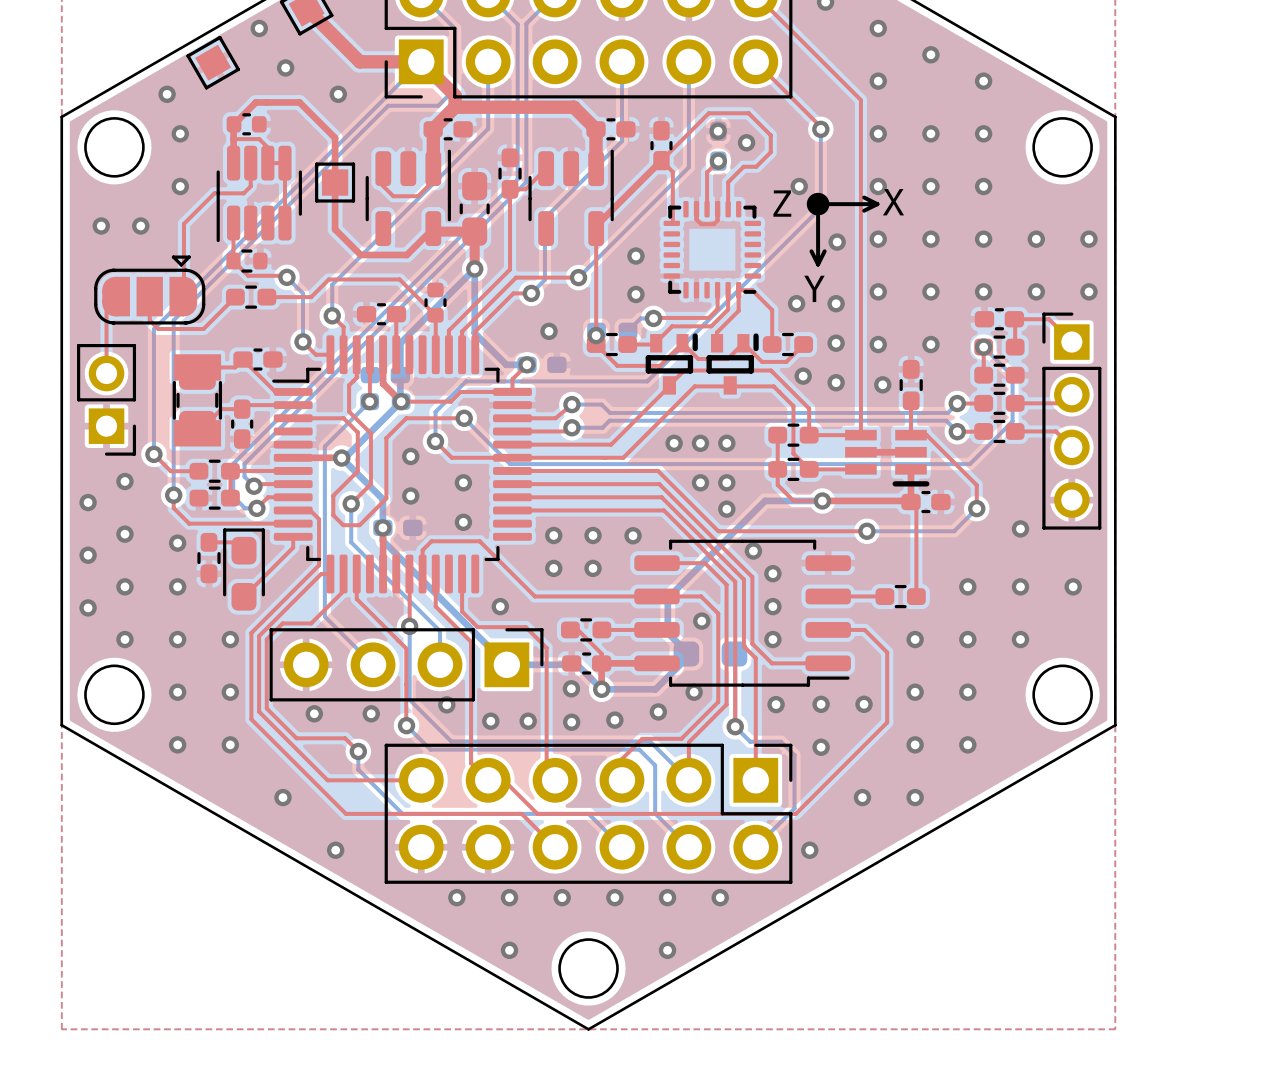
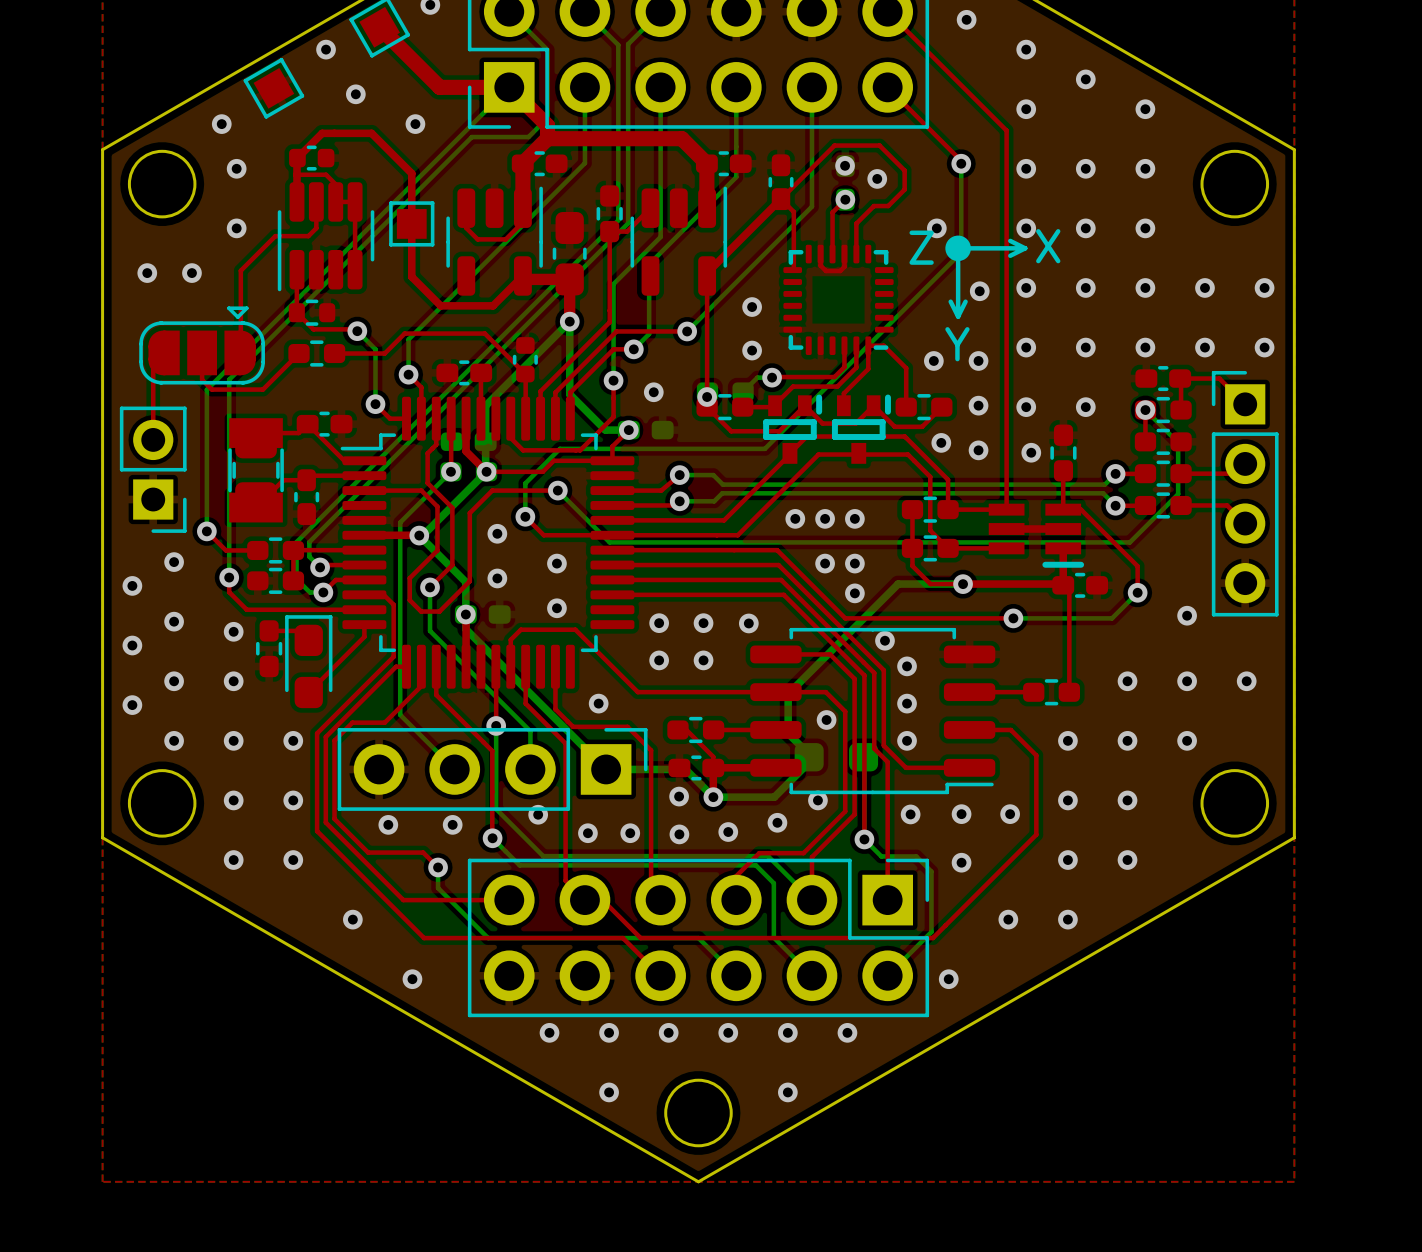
bottom track: none -> (660, 87) (660, 237) (613, 284) (613, 380)
top track: none -> (613, 380) (613, 416) (580, 450) (523, 450) (510, 438) (510, 418)
via: none -> (613, 380)

